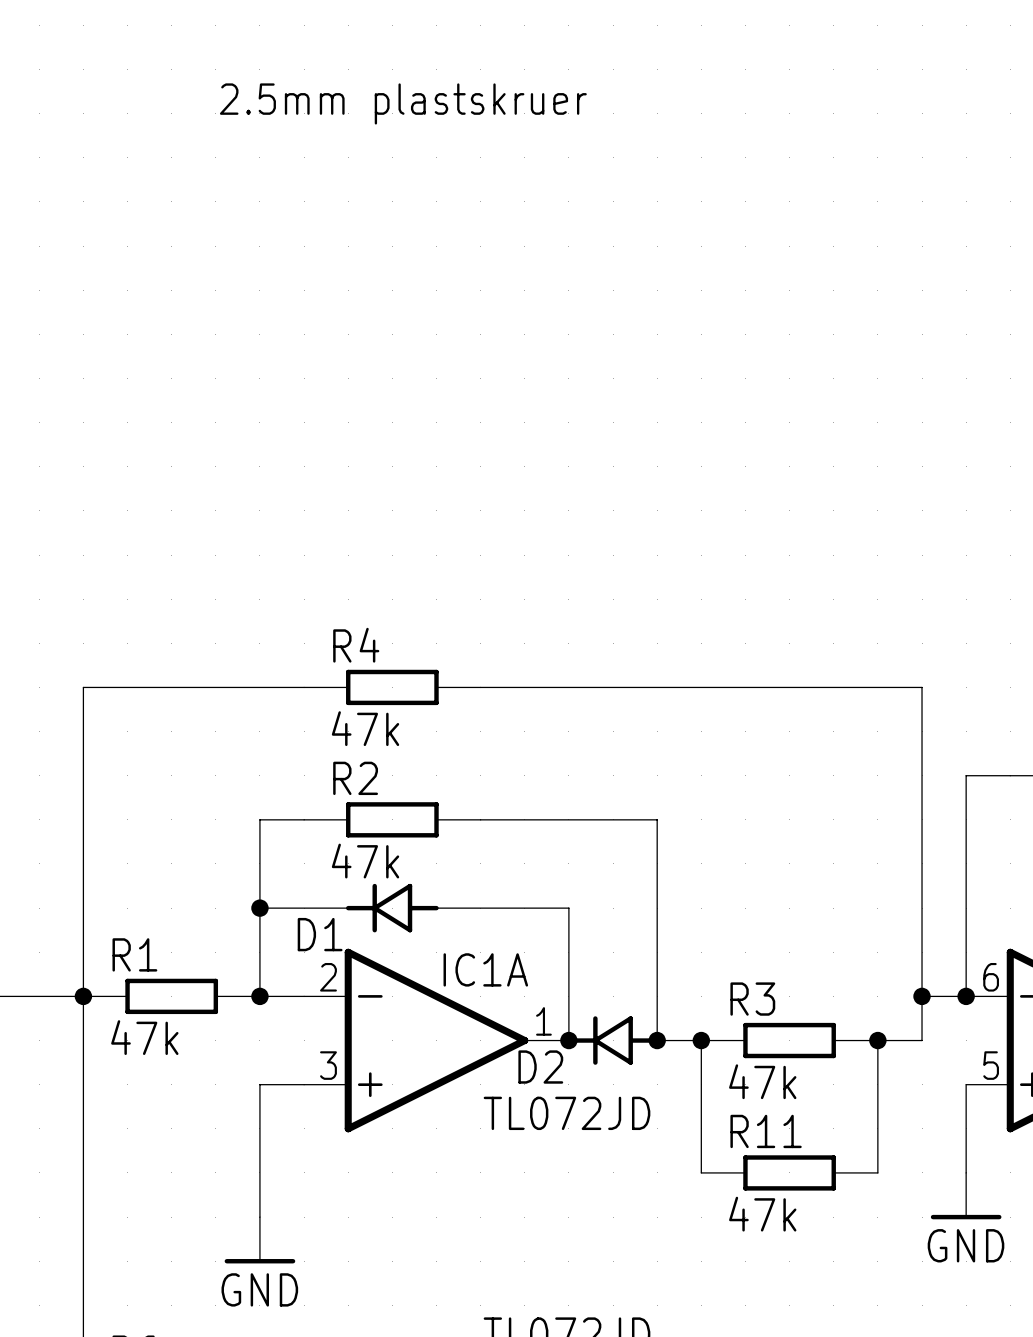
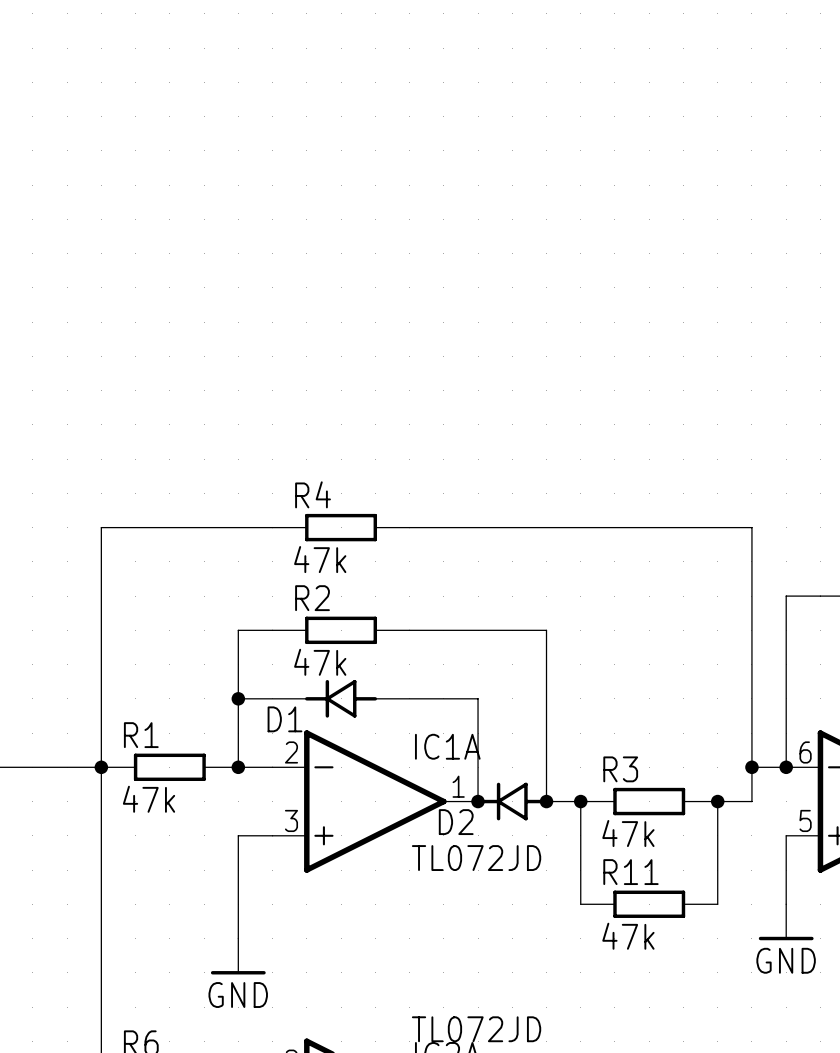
text: 2.5mm plastskruer (403, 103) -> none
IC1A name position: IC1A (485, 969) -> IC1A (447, 746)

